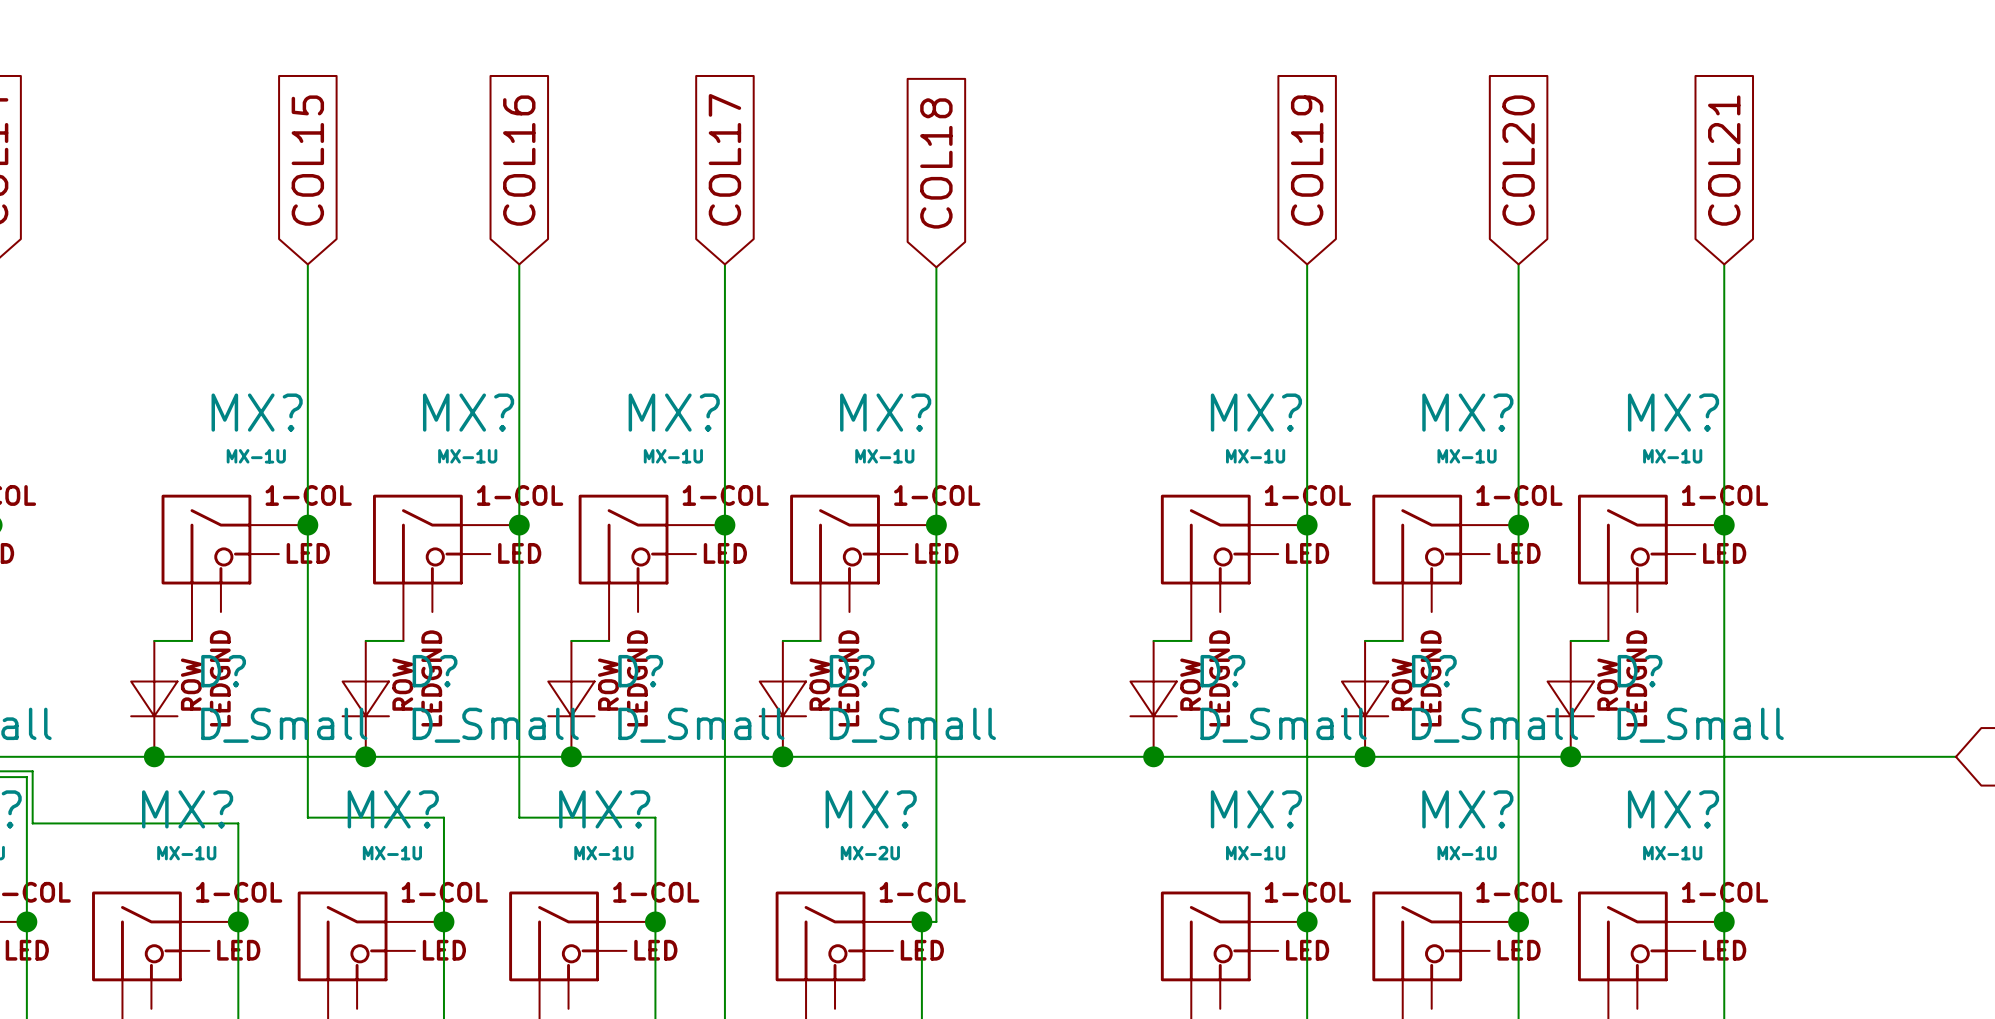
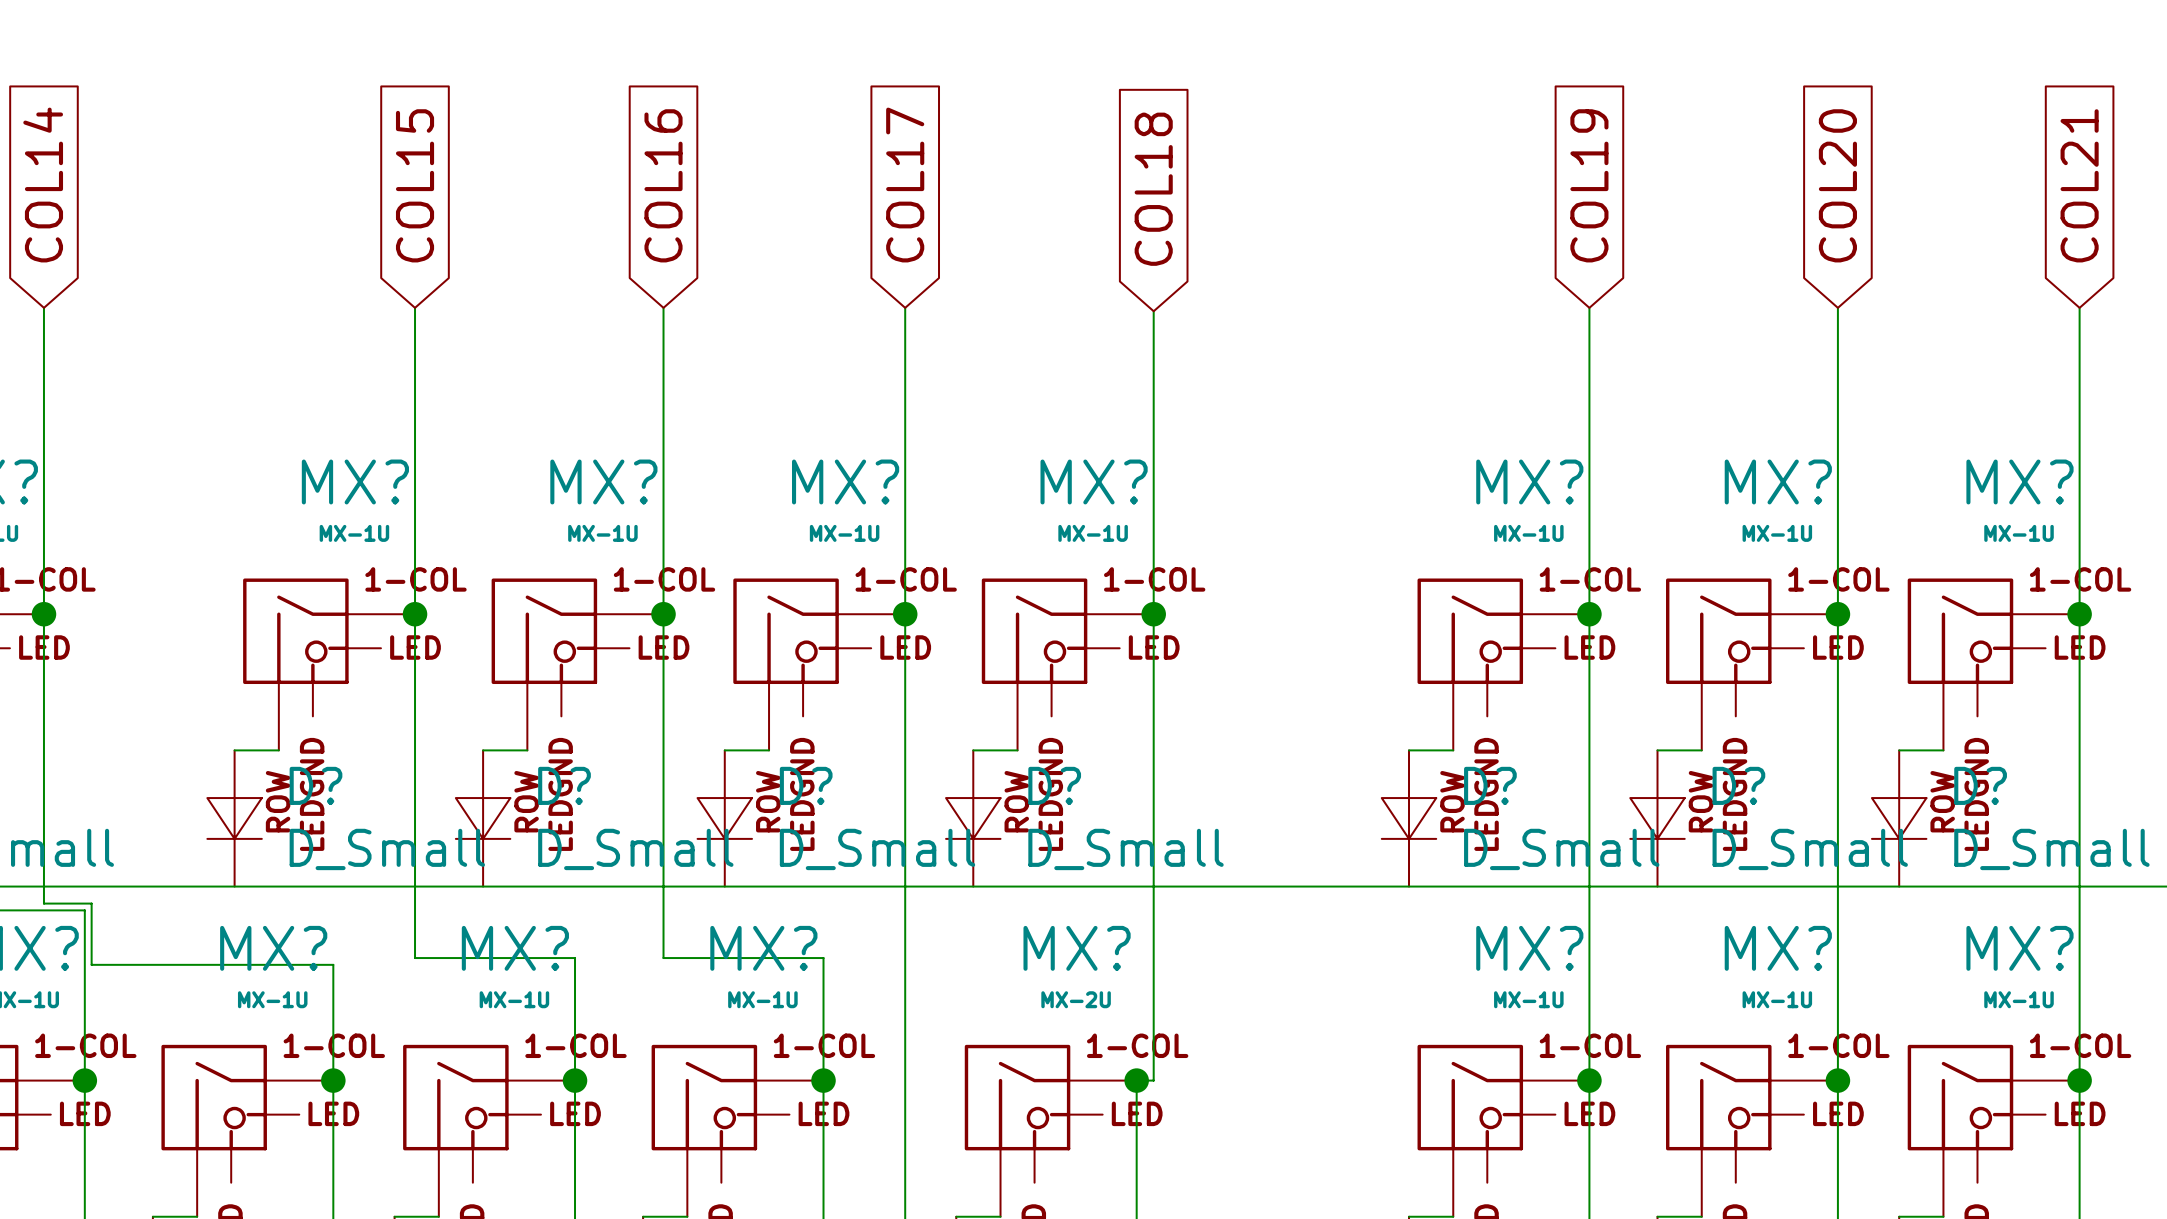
junction: (154, 756) -> none
junction: (365, 756) -> none
junction: (571, 756) -> none
junction: (782, 756) -> none
junction: (1153, 756) -> none
junction: (1365, 756) -> none
junction: (1570, 756) -> none

